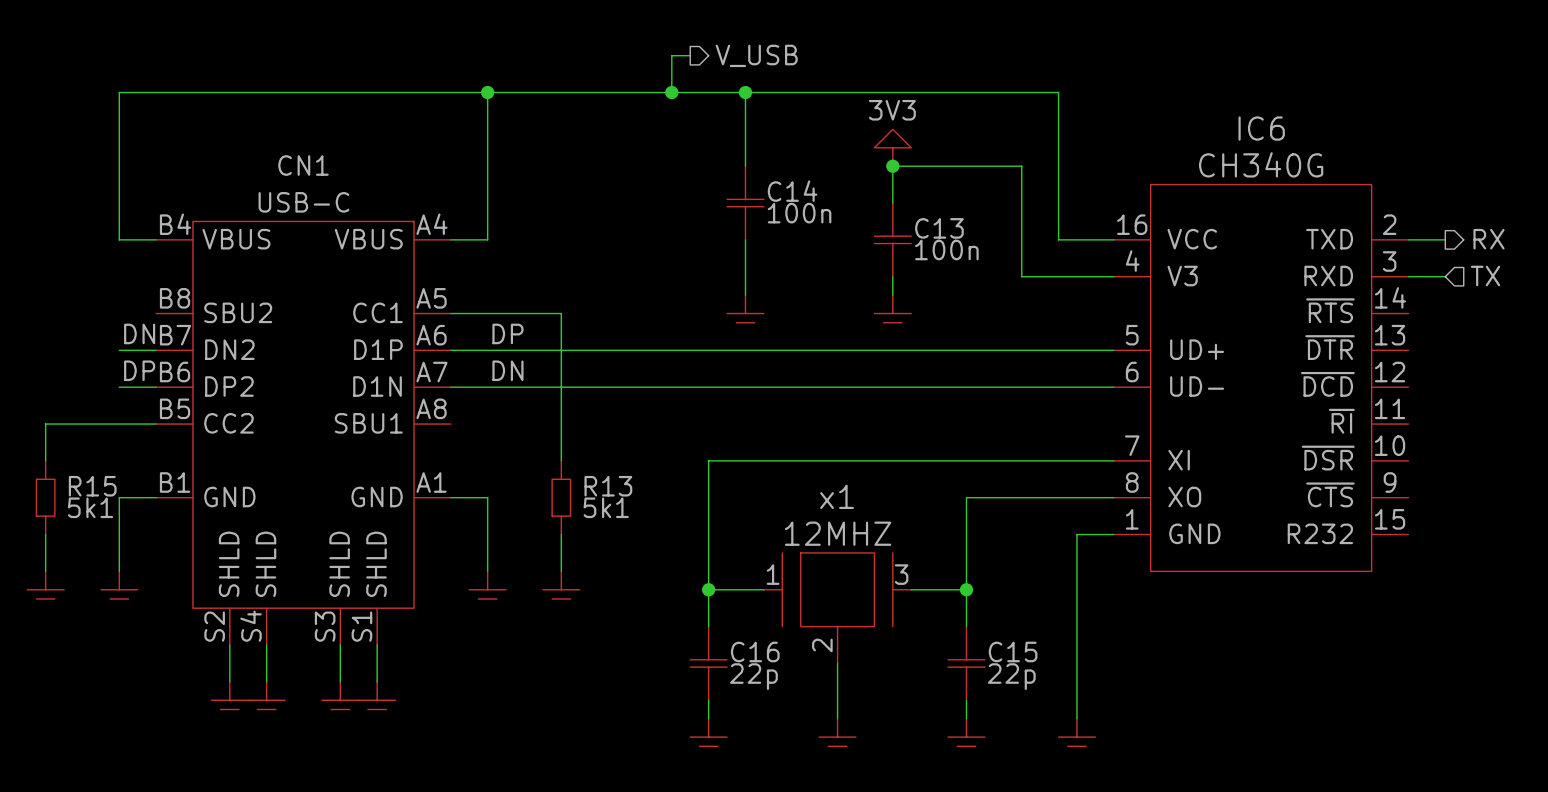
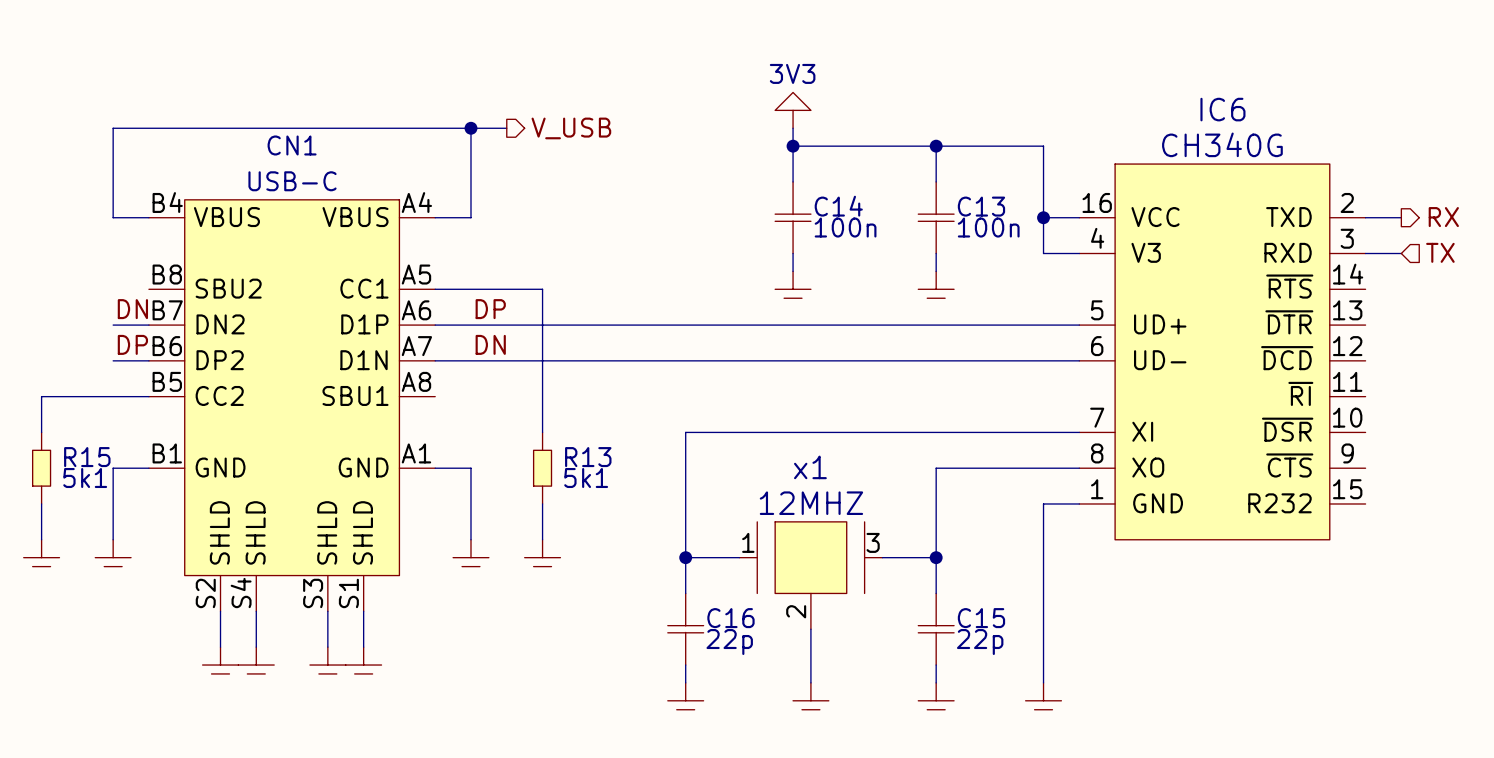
wire: (690, 55) (671, 55) (671, 92) -> none
hierarchical label position: V_USB (756, 55) -> V_USB (571, 128)
wire: (487, 92) (487, 147) -> none
junction position: (487, 92) -> (470, 128)
junction: (671, 92) -> none
wire: (745, 92) (745, 166) -> none
junction: (745, 92) -> none
wire: (119, 147) (119, 92) (1058, 92) (1058, 239) (1076, 239) -> (113, 128) (506, 128)
power symbol position: 3V3 (892, 147) -> 3V3 (793, 110)
junction: none -> (793, 146)
wire: (892, 166) (892, 203) -> (864, 146) (793, 146)
junction: (892, 166) -> none
wire: none -> (936, 146) (936, 181)
junction: none -> (936, 146)
wire: (1021, 166) (1021, 276) (1076, 276) -> (989, 146) (1043, 146) (1043, 253)
C14 position: (745, 203) -> (793, 217)
wire: (745, 239) (745, 295) -> (793, 128) (793, 181)
C13 position: (892, 239) -> (936, 217)
junction: none -> (1043, 217)
wire: none -> (793, 253) (793, 271)
wire: (892, 276) (892, 295) -> (936, 253) (936, 271)
power symbol: (745, 313) -> none
power symbol: none -> (793, 289)
power symbol: (892, 313) -> none
power symbol: none -> (936, 289)

